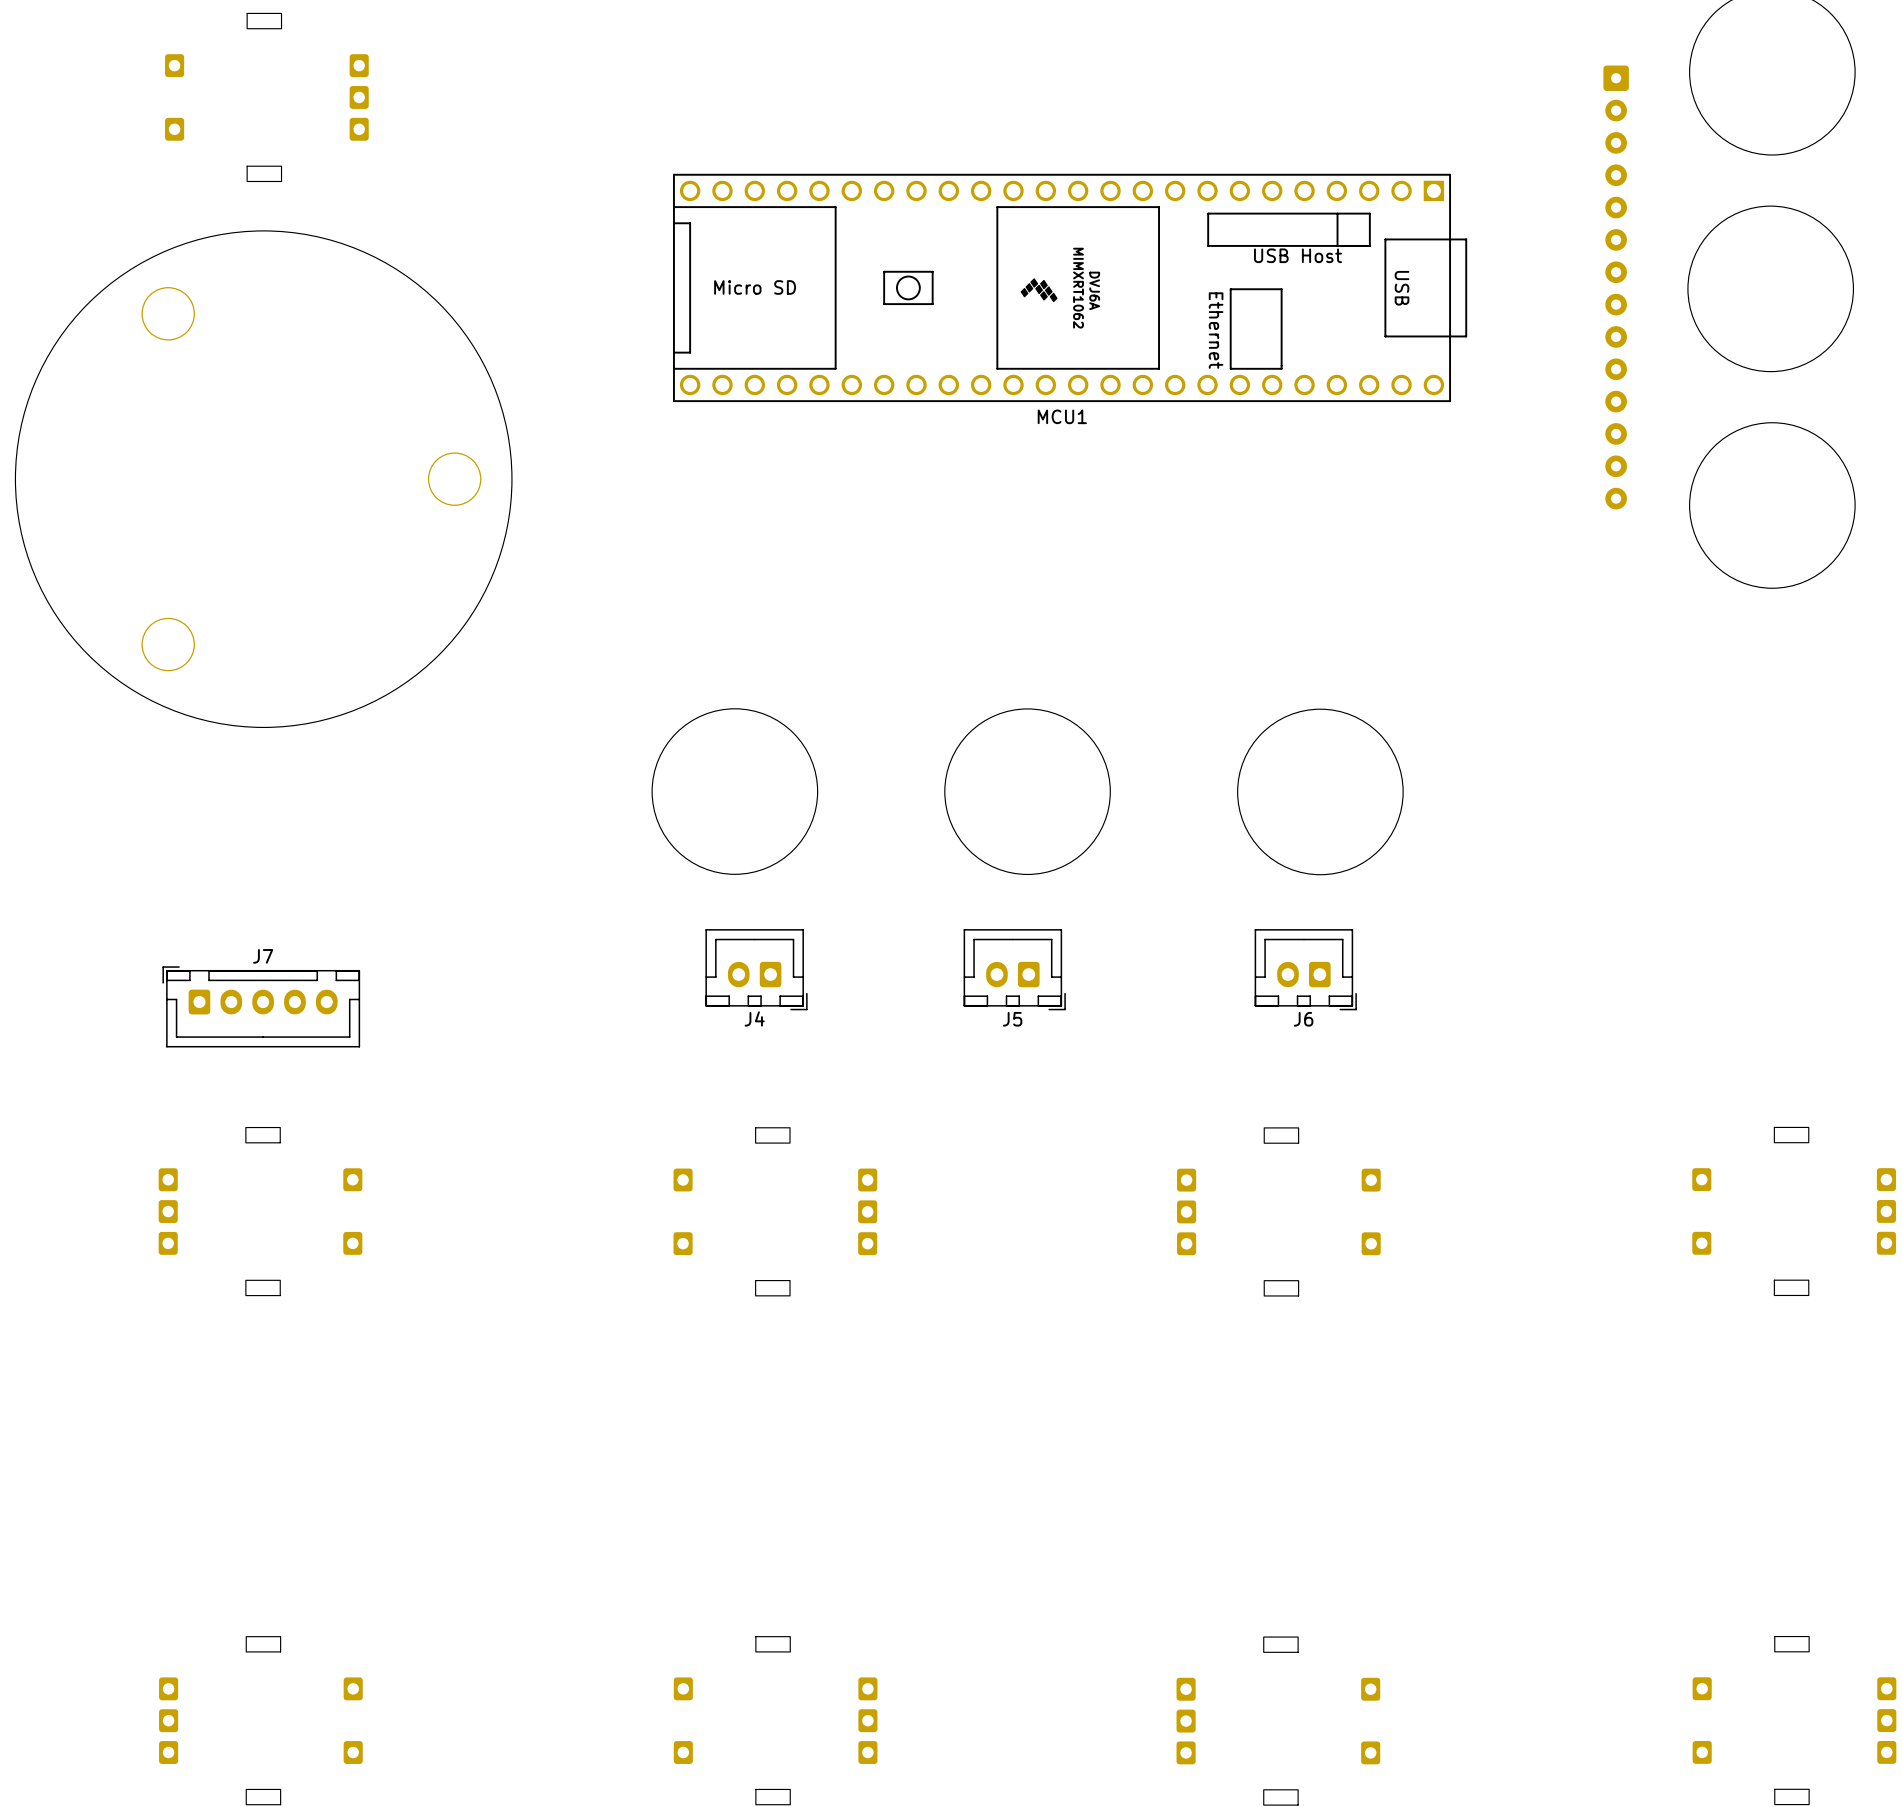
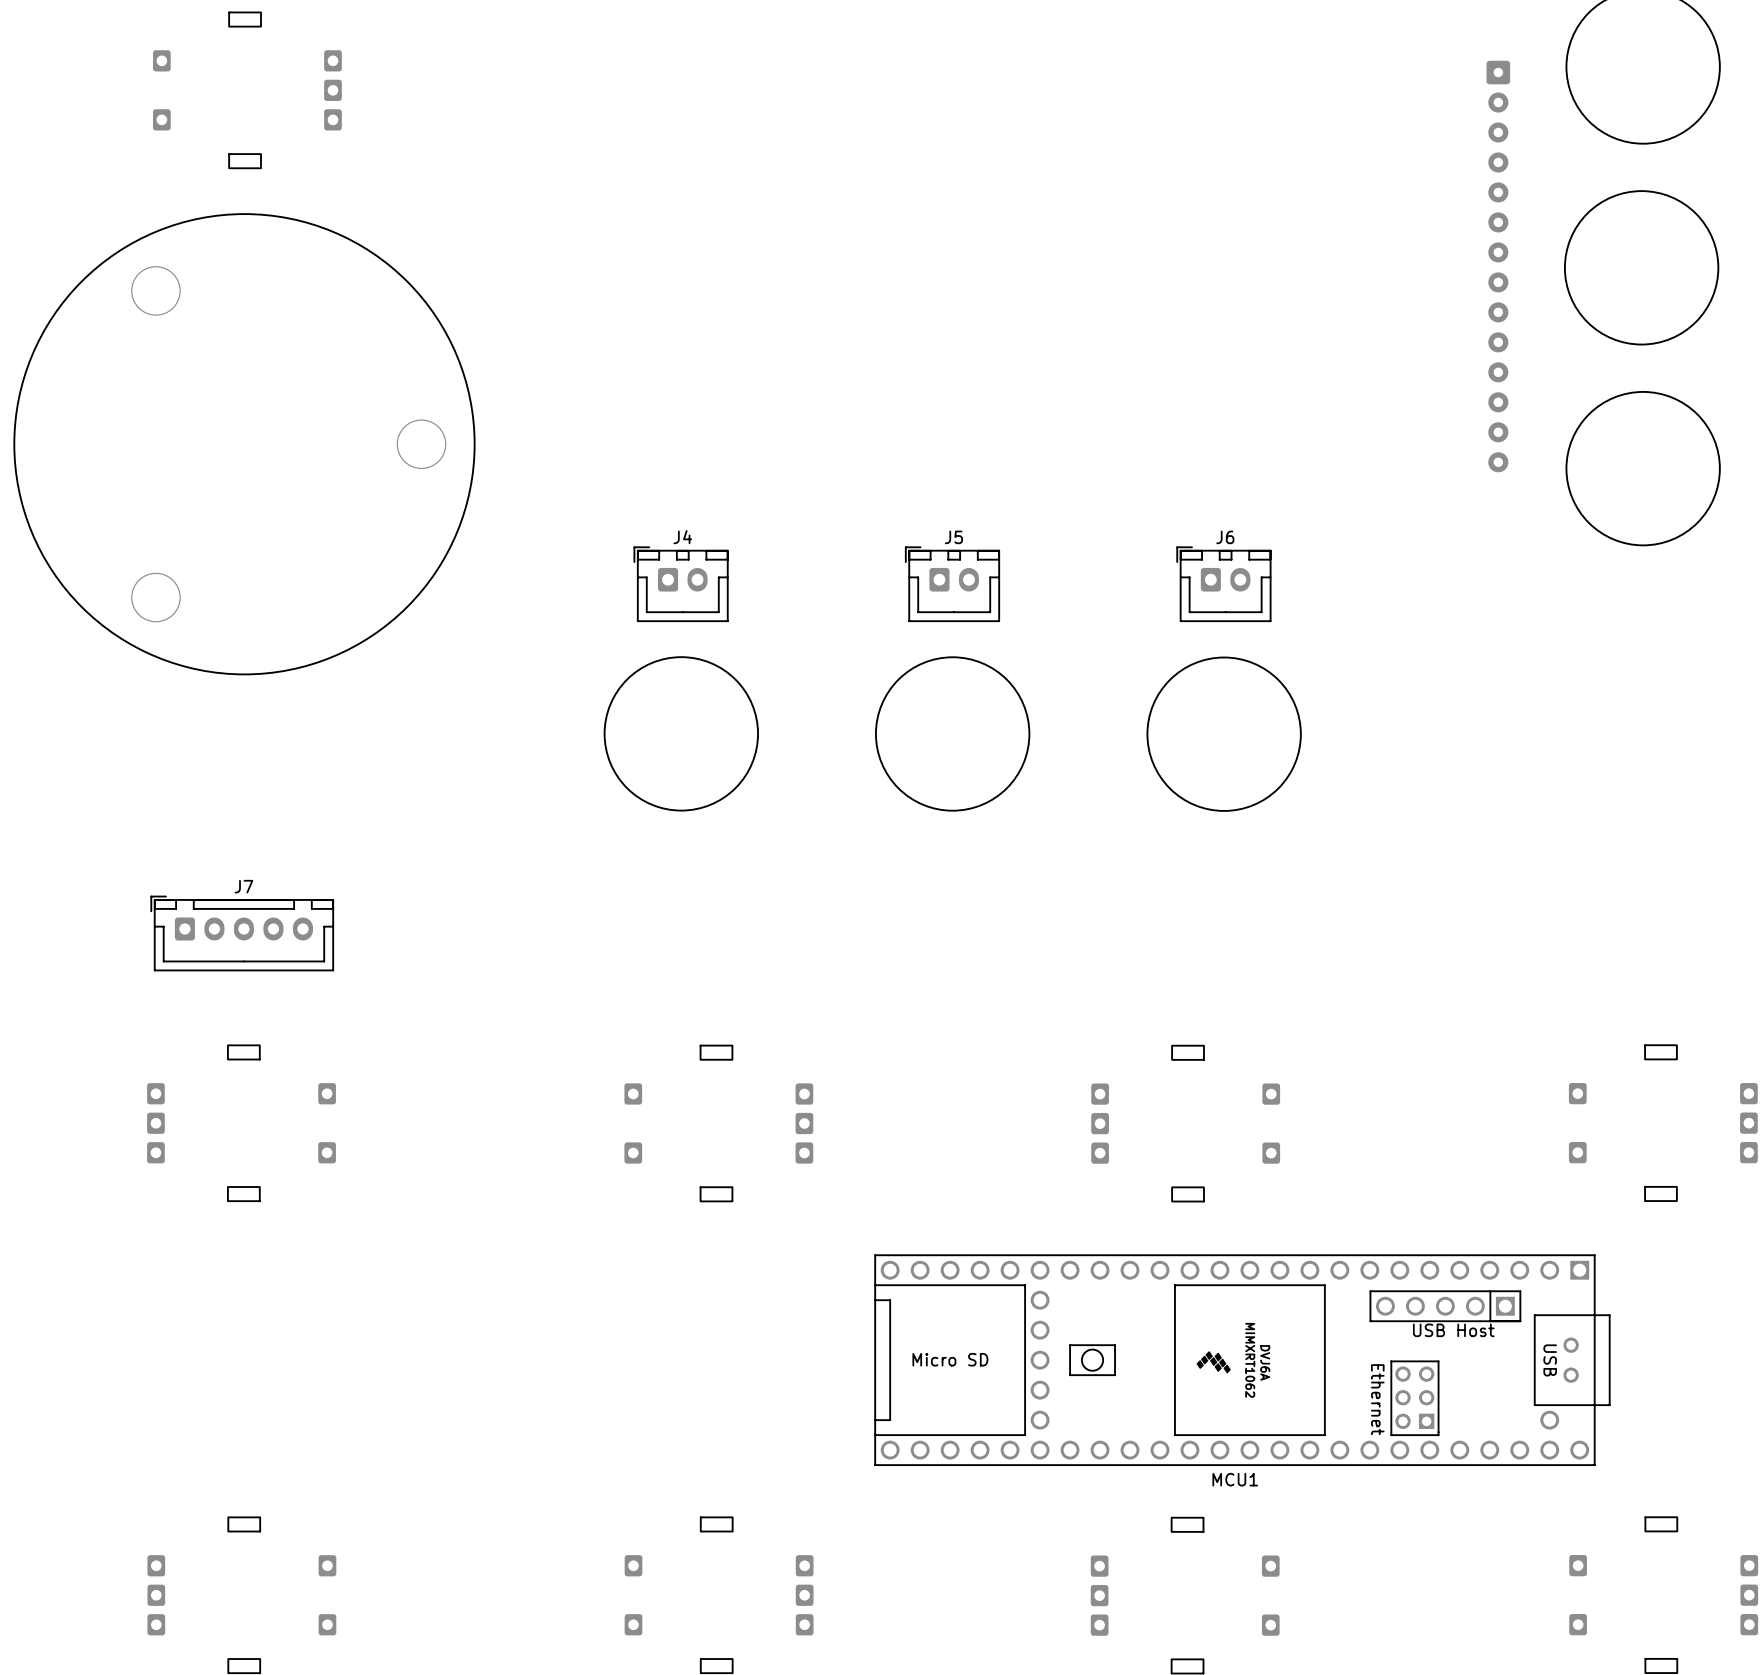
MCU1 footprint: [673, 173, 1468, 403] -> [874, 1254, 1611, 1466]
J4 rotation: 0° (756, 969) -> 180° (681, 584)
J4 position: (756, 969) -> (681, 584)
J5 rotation: 0° (1014, 969) -> 180° (952, 584)
J5 position: (1014, 969) -> (952, 584)
J6 rotation: 0° (1305, 969) -> 180° (1223, 584)
J6 position: (1305, 969) -> (1223, 584)

